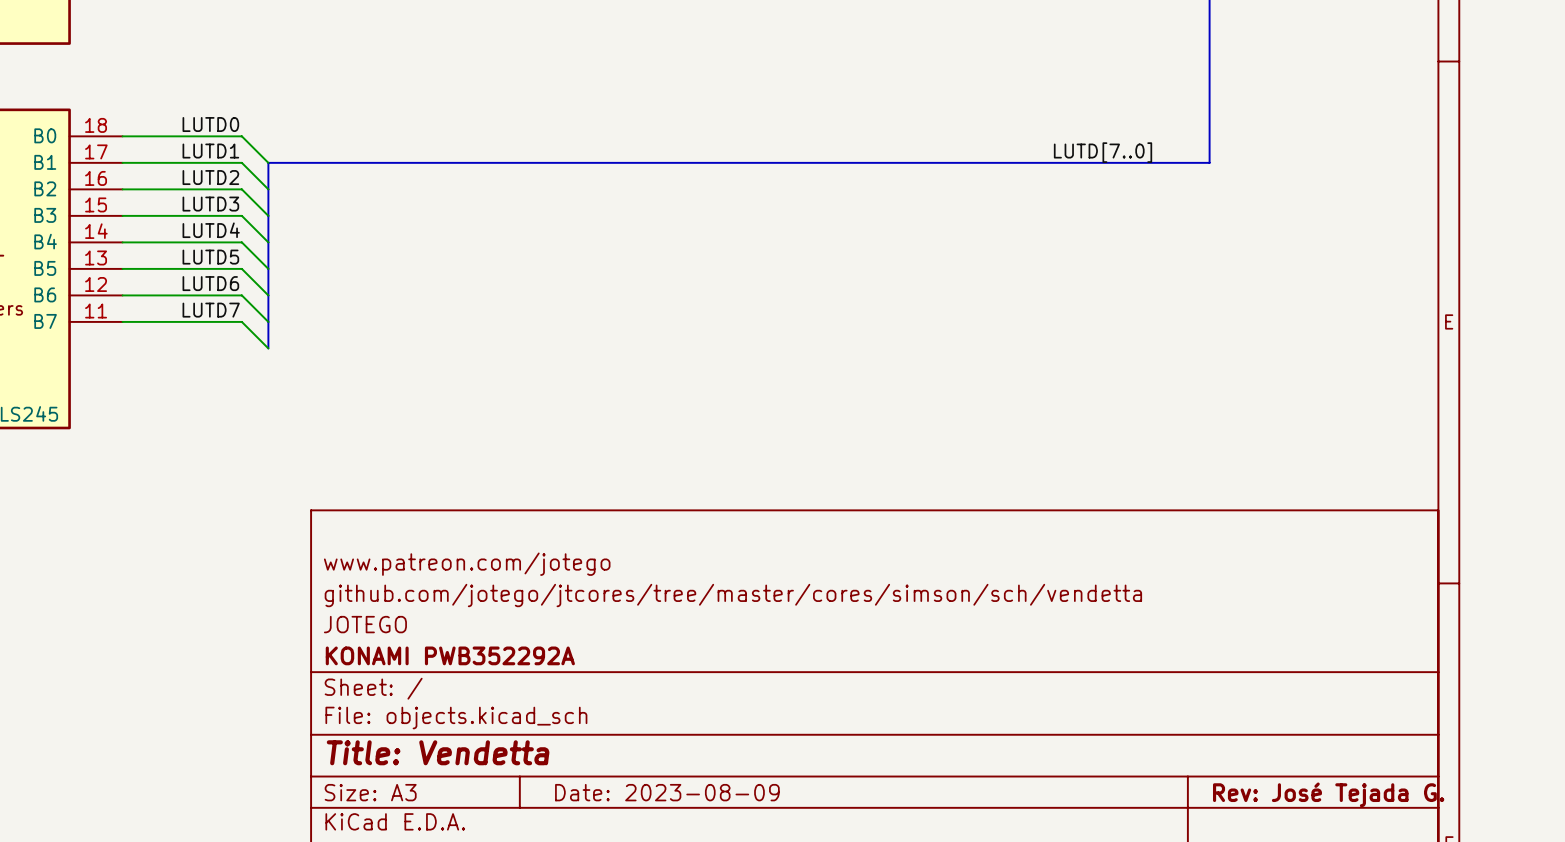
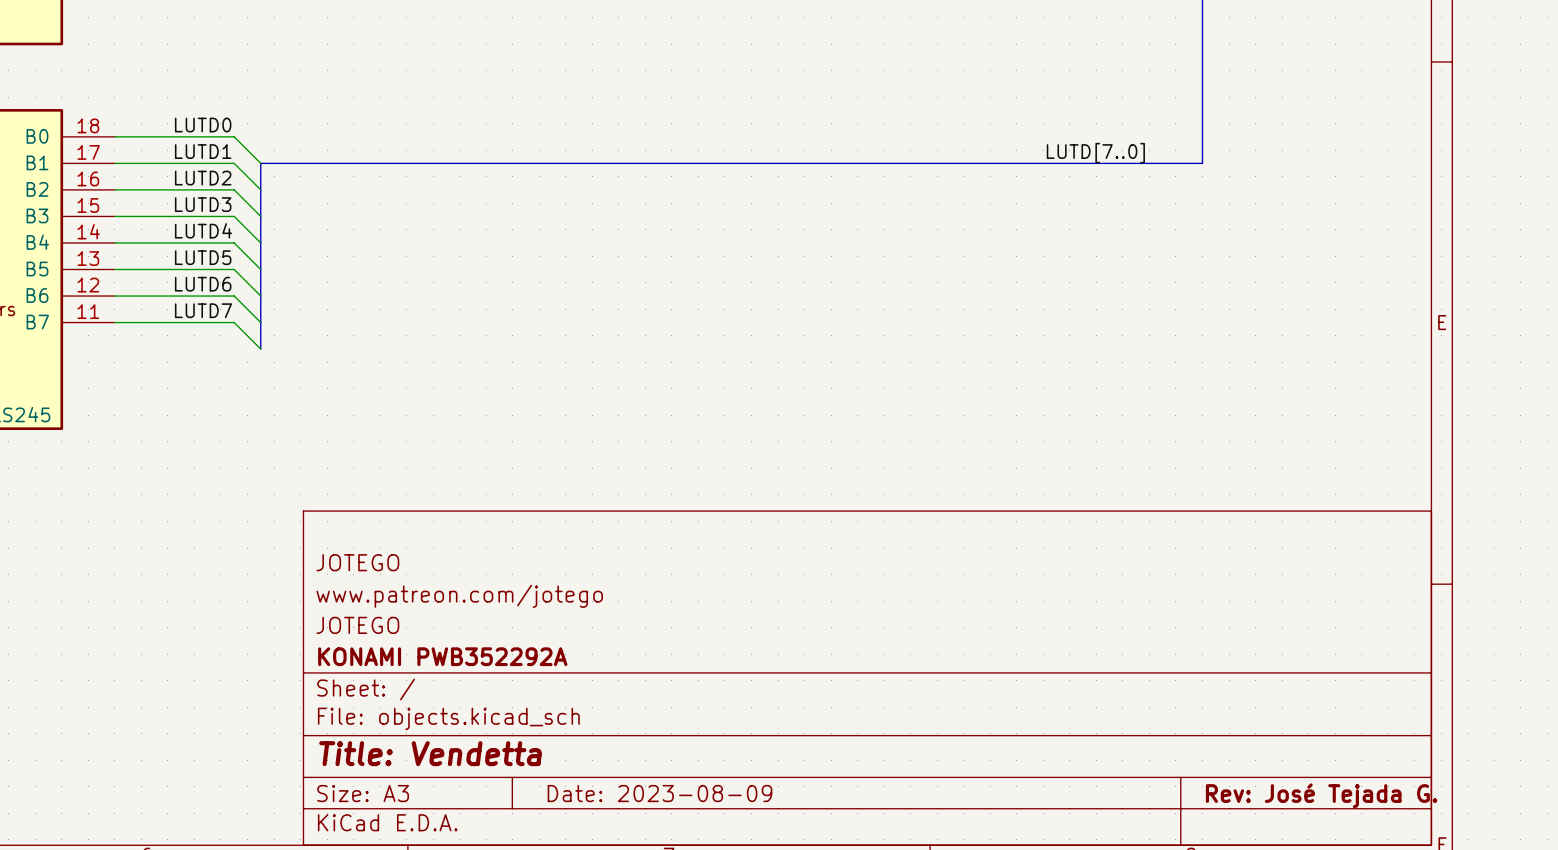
title block: www.patreon.com/jotego (467, 564) -> JOTEGO (357, 562)
title block: github.com/jotego/jtcores/tree/master/cores/simson/sch/vendetta (733, 595) -> www.patreon.com/jotego (459, 596)

